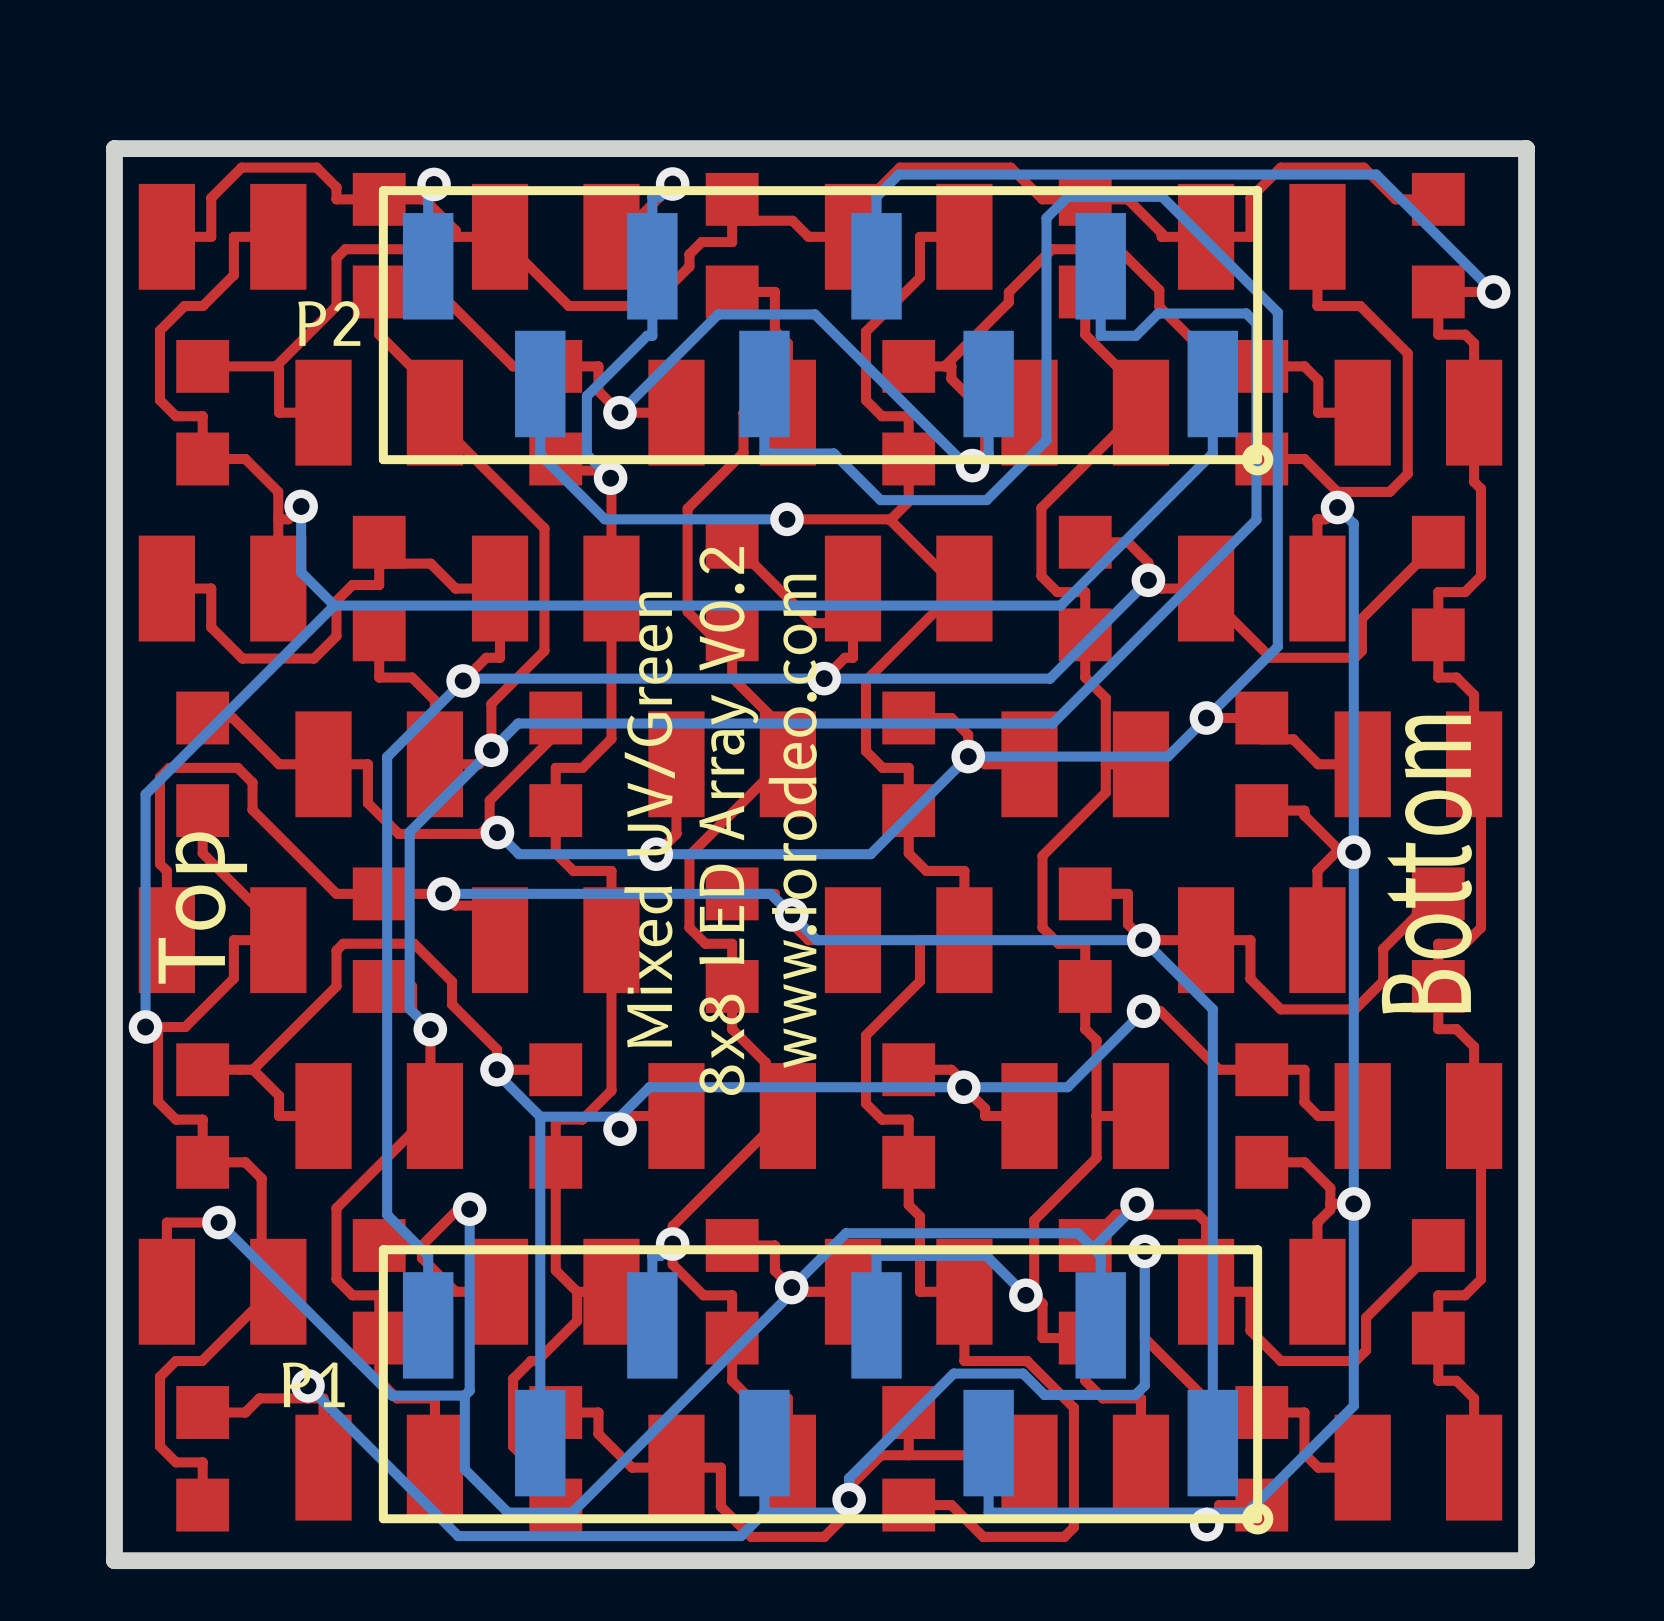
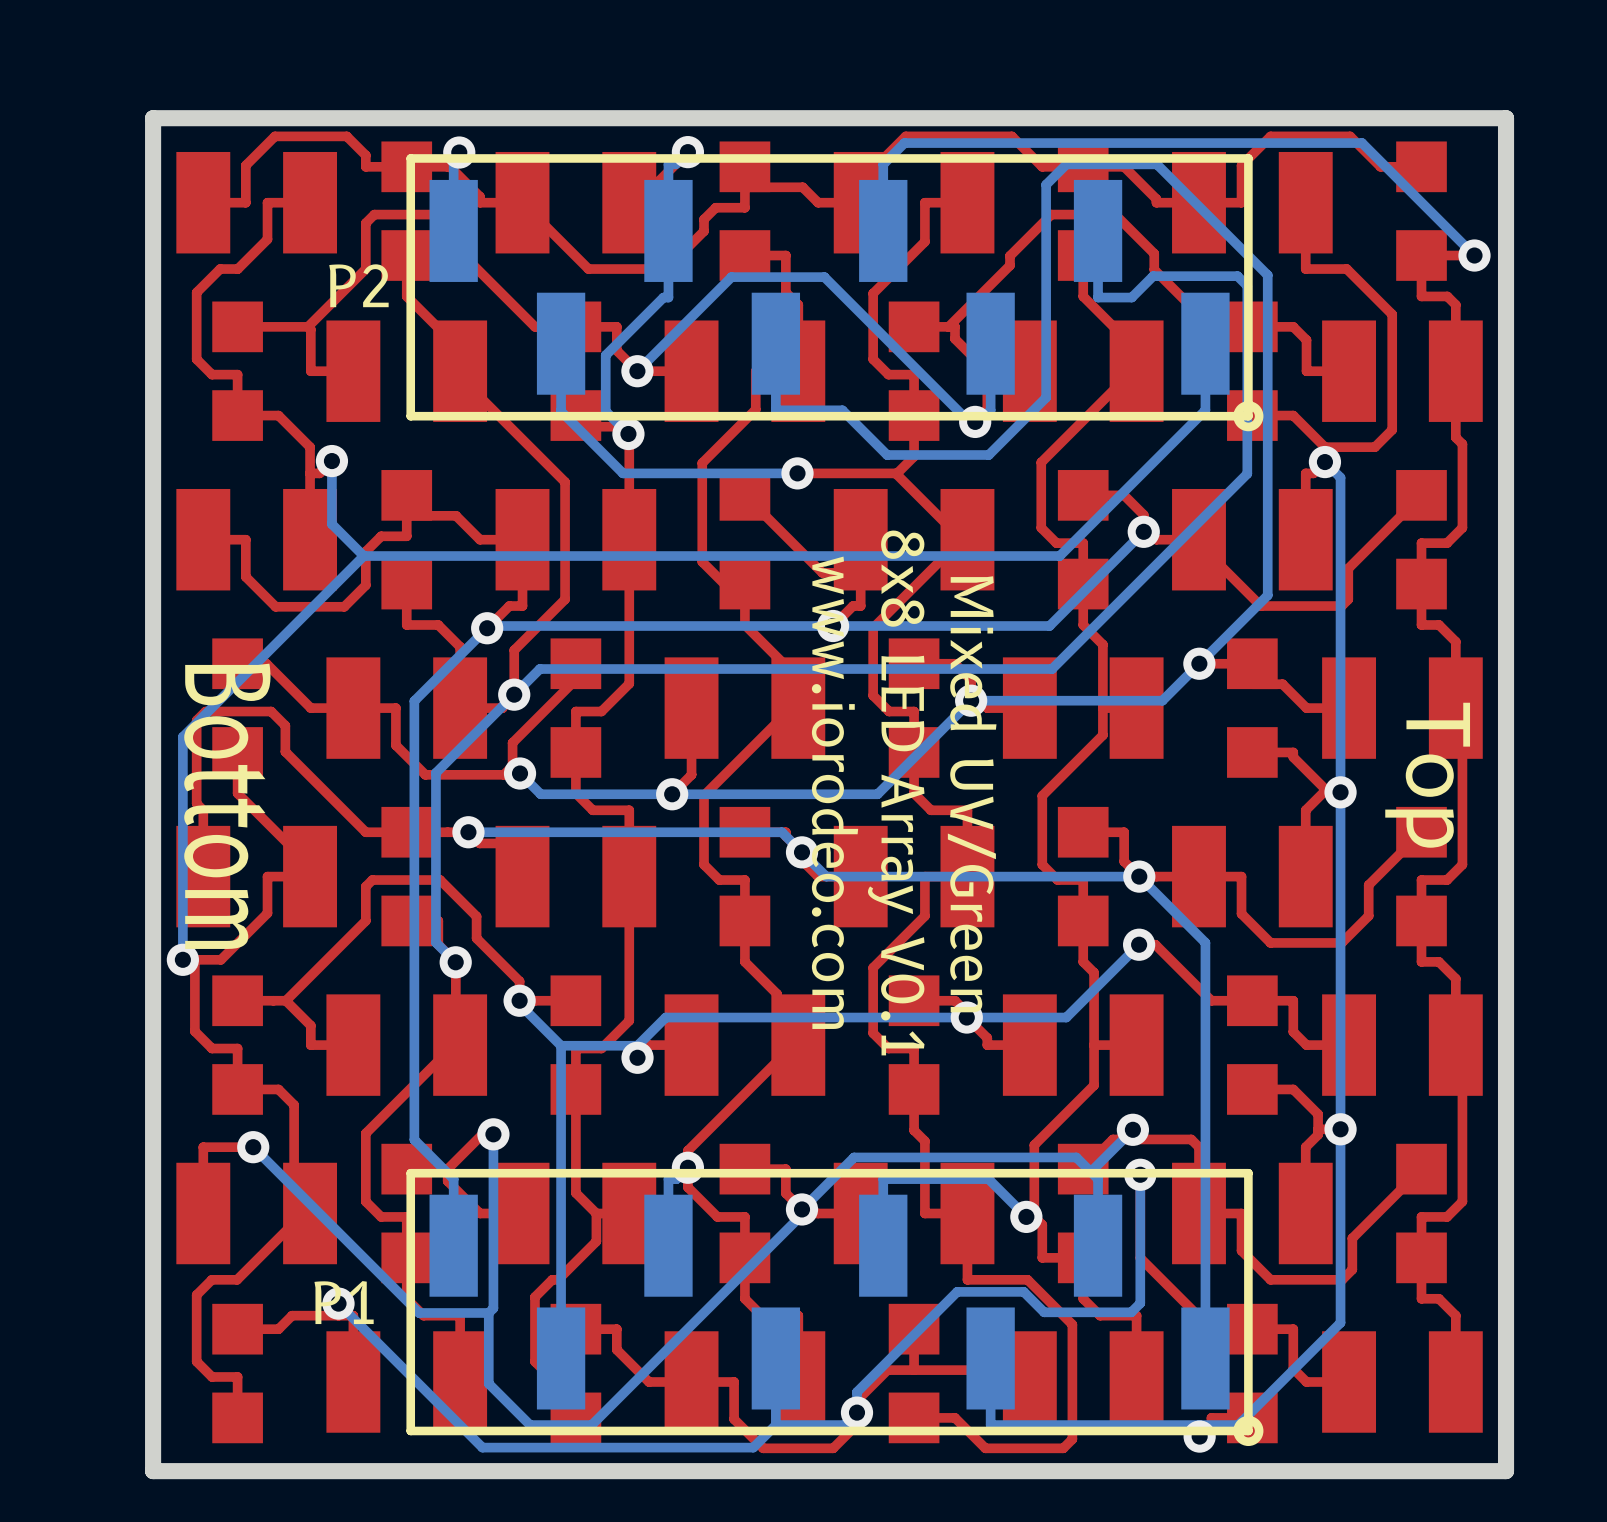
text rotation: 0° (649, 819) -> 180° (972, 794)
text: 8x8 LED Array V0.2 (728, 821) -> none
text rotation: 0° (792, 821) -> 180° (835, 792)
text: none -> 8x8 LED Array V0.1 (896, 792)
text: Bottom (1426, 864) -> Top (1427, 775)
text: Top (202, 908) -> Bottom (227, 806)

